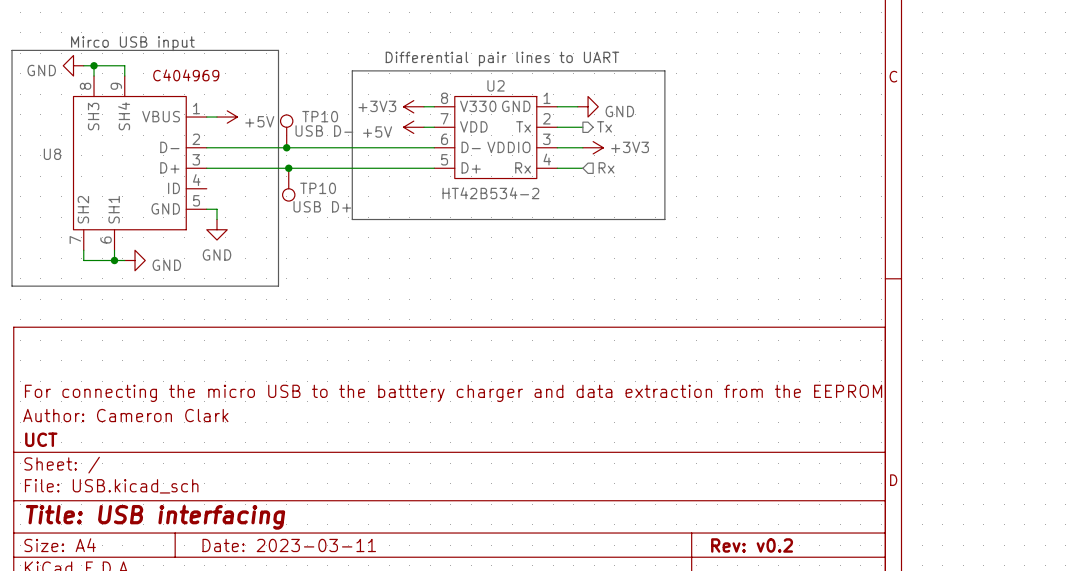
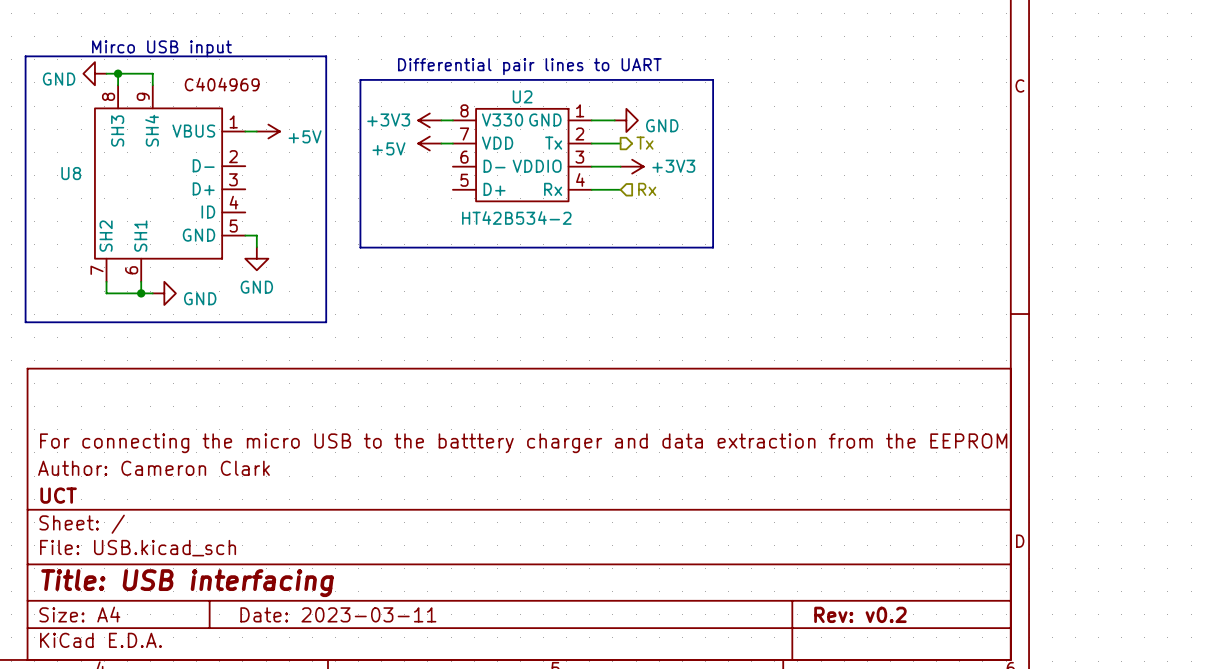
text position: Differential pair lines to UART (502, 59) -> Differential pair lines to UART (529, 66)
line: (352, 70) (664, 70) (664, 219) (352, 219) (352, 70) -> (360, 79) (713, 79) (713, 247) (360, 247) (360, 79)
power symbol position: +3V3 (413, 106) -> +3V3 (429, 120)
wire: (424, 106) (434, 106) -> (441, 120) (452, 120)
wire: (557, 106) (577, 106) -> (591, 120) (614, 120)
power symbol position: GND (588, 106) -> GND (626, 120)
hierarchical label position: Tx (604, 126) -> Tx (645, 143)
power symbol position: +5V (413, 127) -> +5V (429, 143)
wire: (424, 127) (434, 127) -> (441, 143) (452, 143)
wire: (557, 127) (582, 127) -> (591, 143) (620, 143)
TP10: USB D- (286, 131) -> none
U2 position: (495, 137) -> (522, 155)
wire: (206, 147) (434, 147) -> none
junction: (286, 147) -> none
wire: (557, 147) (582, 147) -> (591, 166) (620, 166)
power symbol position: +3V3 (593, 147) -> +3V3 (632, 166)
hierarchical label position: Rx (606, 167) -> Rx (647, 189)
wire: (206, 168) (434, 168) -> none
junction: (288, 168) -> none
wire: (557, 168) (582, 168) -> (591, 189) (620, 189)
TP10: USB D+ (288, 184) -> none

